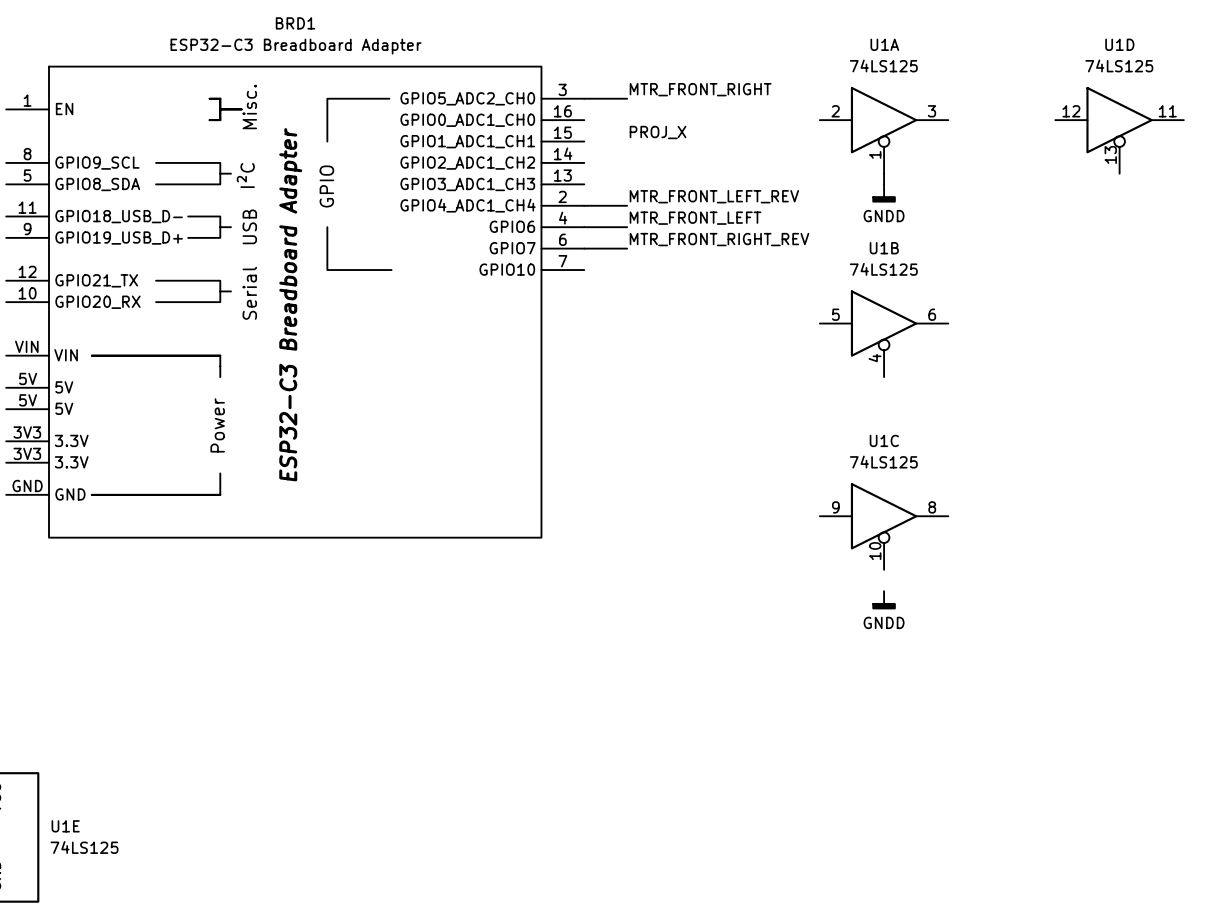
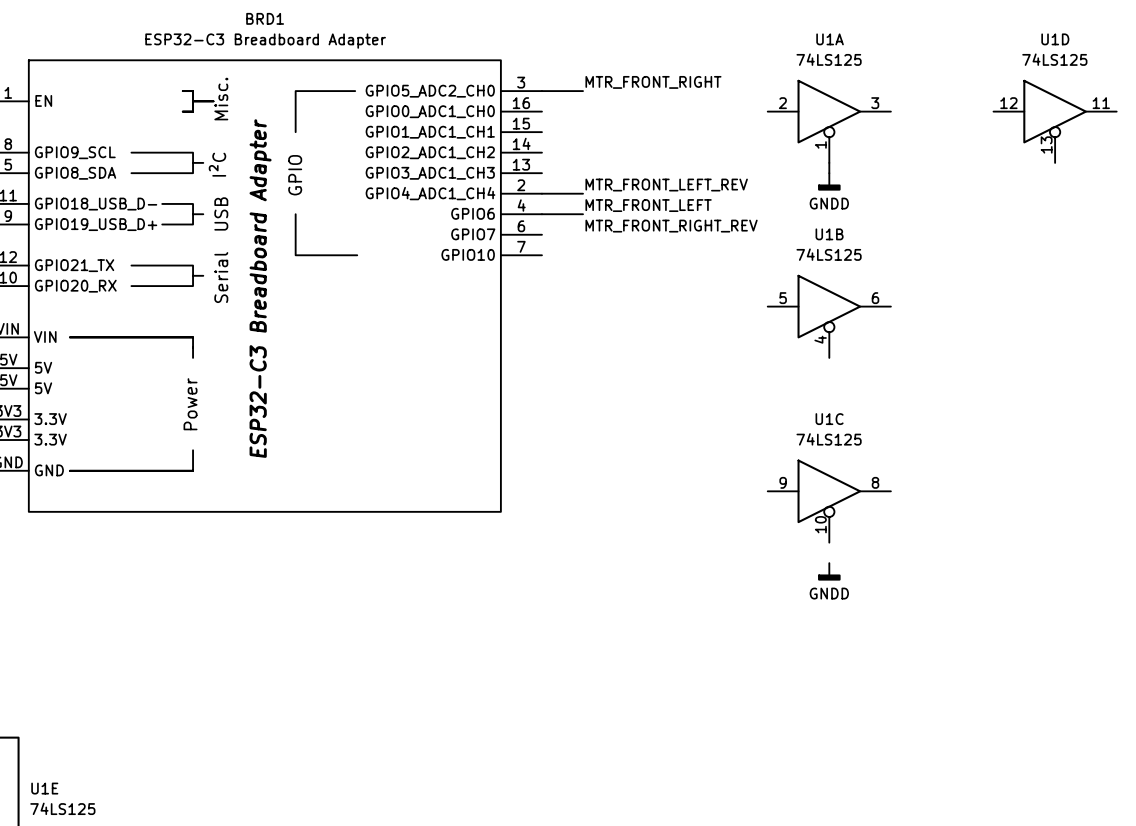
label: PROJ_X (658, 132) -> none
wire: (584, 248) (627, 248) -> none

